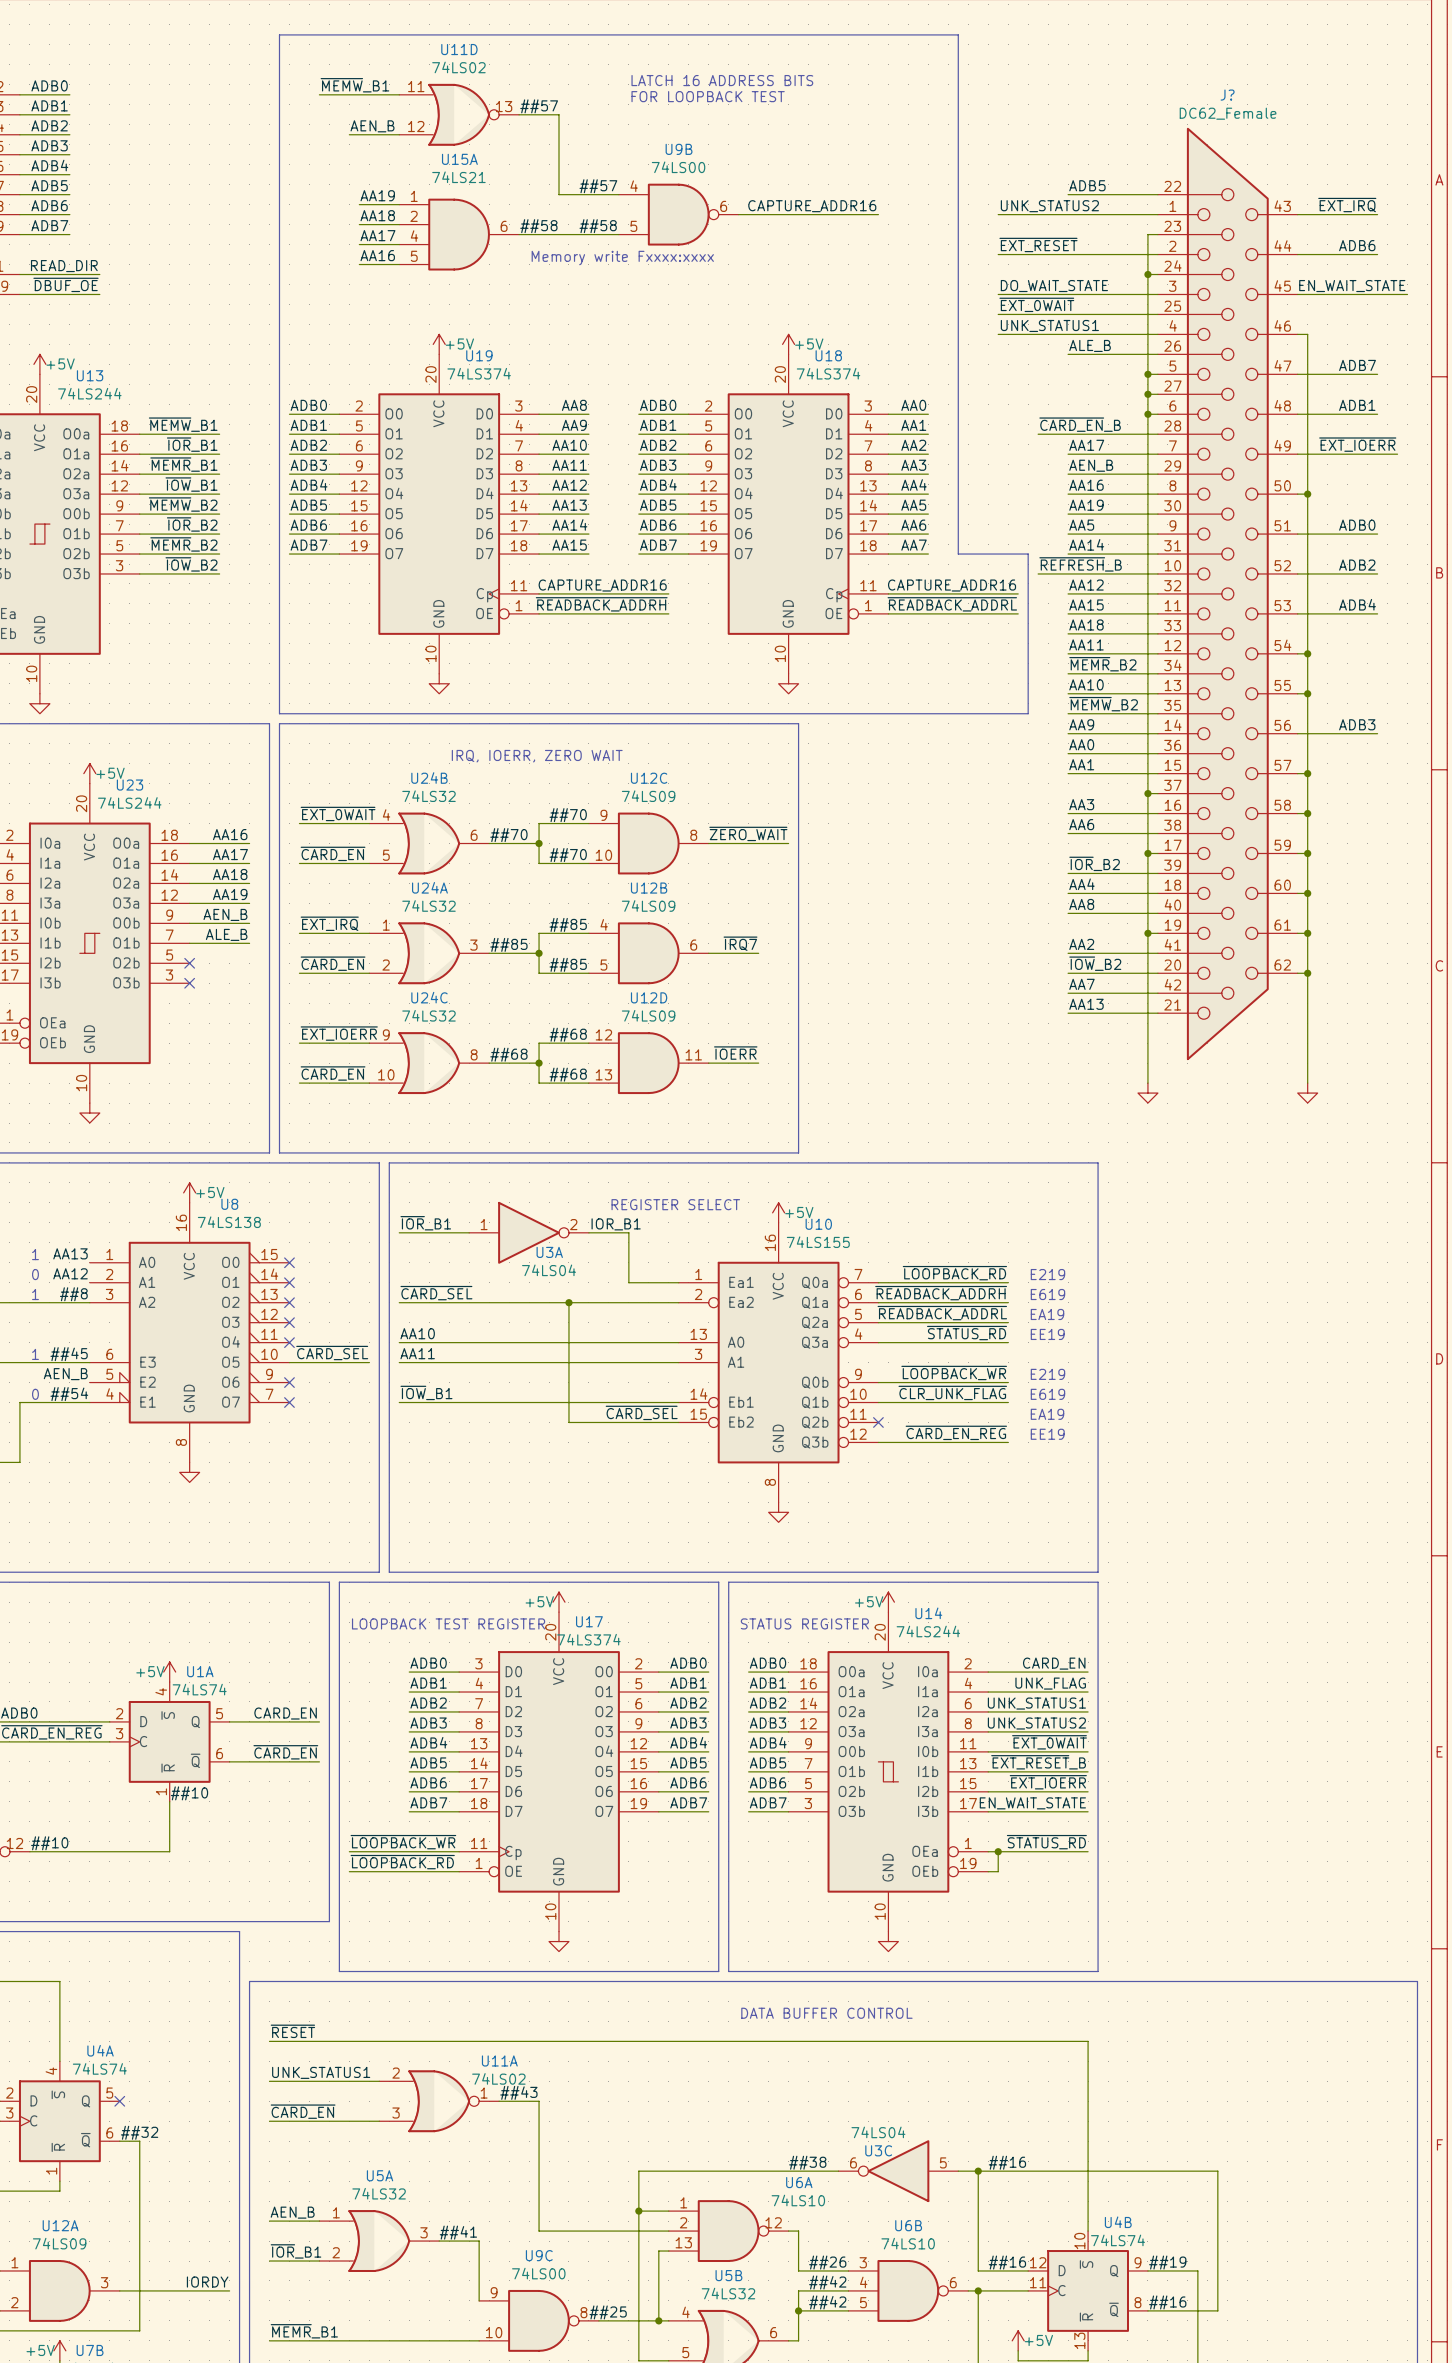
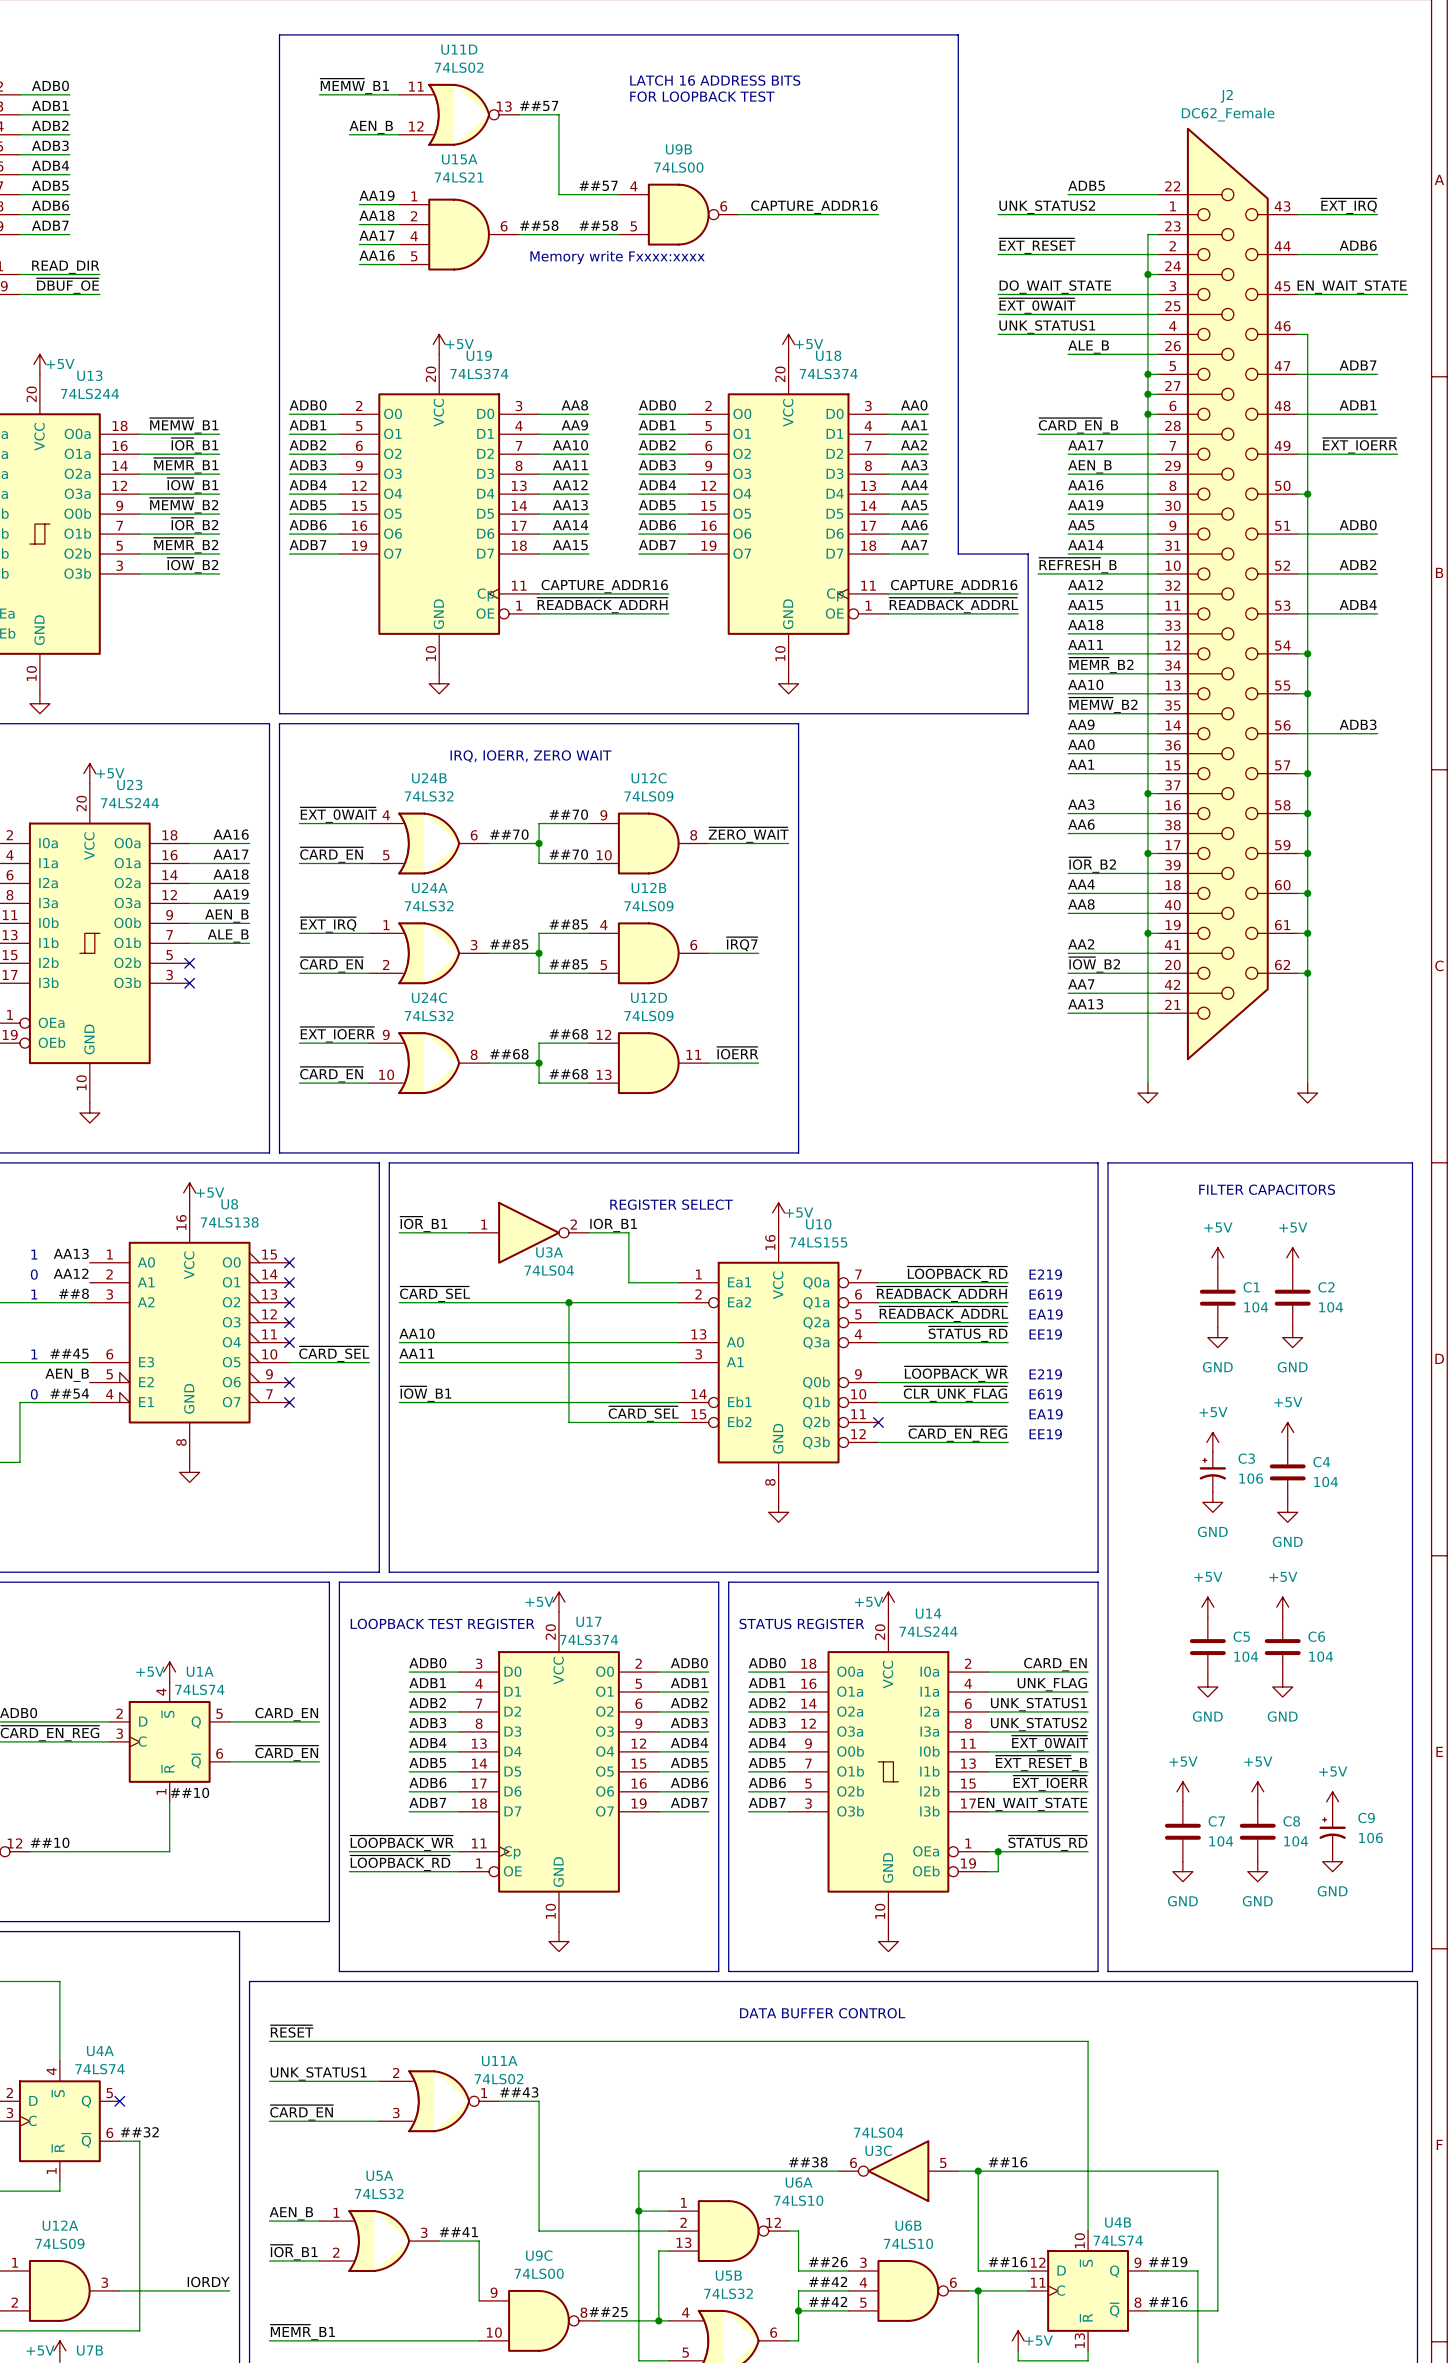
J? name: J? (1227, 95) -> J2 (1226, 96)
line: none -> (1108, 1162) (1412, 1162) (1412, 1971) (1108, 1971) (1108, 1162)
text: none -> FILTER CAPACITORS (1267, 1189)
power symbol: none -> +5V (1217, 1257)
power symbol: none -> +5V (1292, 1257)
C1: none -> 104 (1217, 1297)
C2: none -> 104 (1292, 1297)
power symbol: none -> GND (1217, 1337)
power symbol: none -> GND (1292, 1337)
power symbol: none -> +5V (1287, 1432)
power symbol: none -> +5V (1212, 1442)
C3: none -> 106 (1212, 1472)
C4: none -> 104 (1287, 1472)
power symbol: none -> GND (1212, 1502)
power symbol: none -> GND (1287, 1512)
power symbol: none -> +5V (1207, 1607)
power symbol: none -> +5V (1282, 1607)
C5: none -> 104 (1207, 1647)
C6: none -> 104 (1282, 1647)
power symbol: none -> GND (1207, 1687)
power symbol: none -> GND (1282, 1687)
power symbol: none -> +5V (1182, 1791)
power symbol: none -> +5V (1257, 1791)
power symbol: none -> +5V (1332, 1801)
C7: none -> 104 (1182, 1831)
C8: none -> 104 (1257, 1831)
C9: none -> 106 (1332, 1831)
power symbol: none -> GND (1332, 1861)
power symbol: none -> GND (1182, 1871)
power symbol: none -> GND (1257, 1871)

